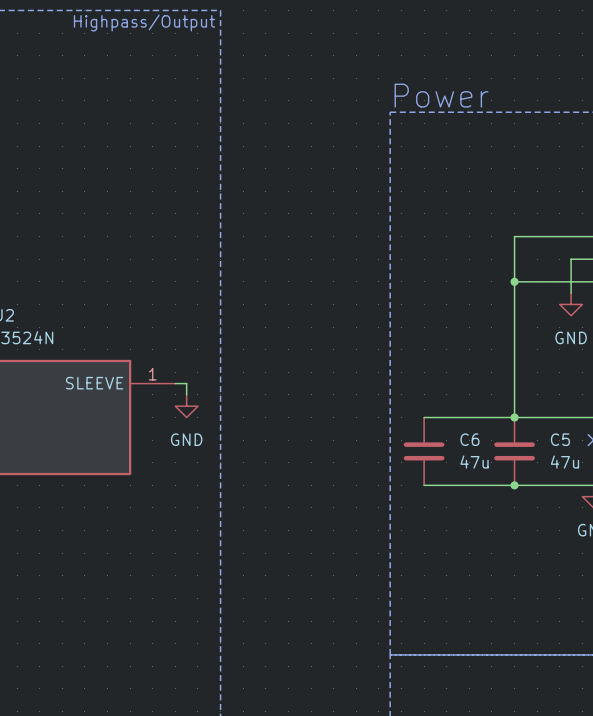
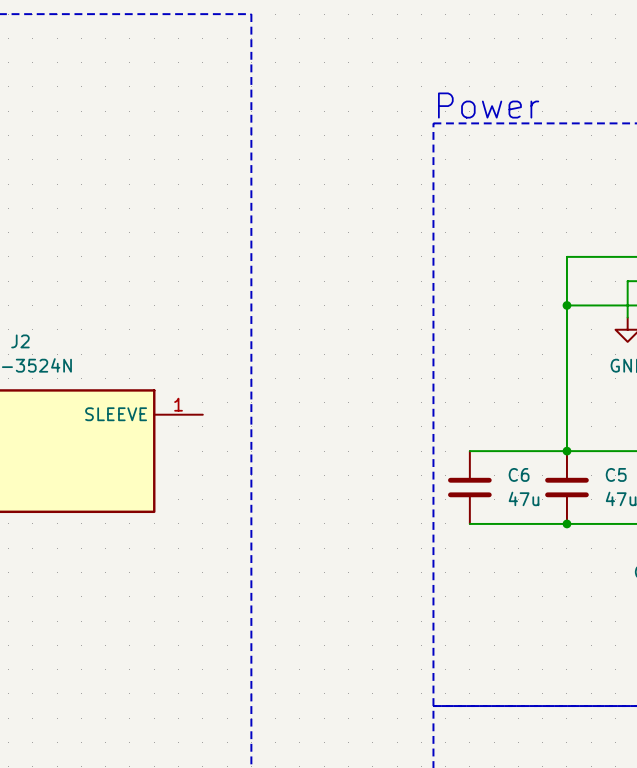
text: Highpass/Output (144, 23) -> none
wire: (175, 383) (186, 383) (186, 394) -> none
power symbol: GND (186, 406) -> none

